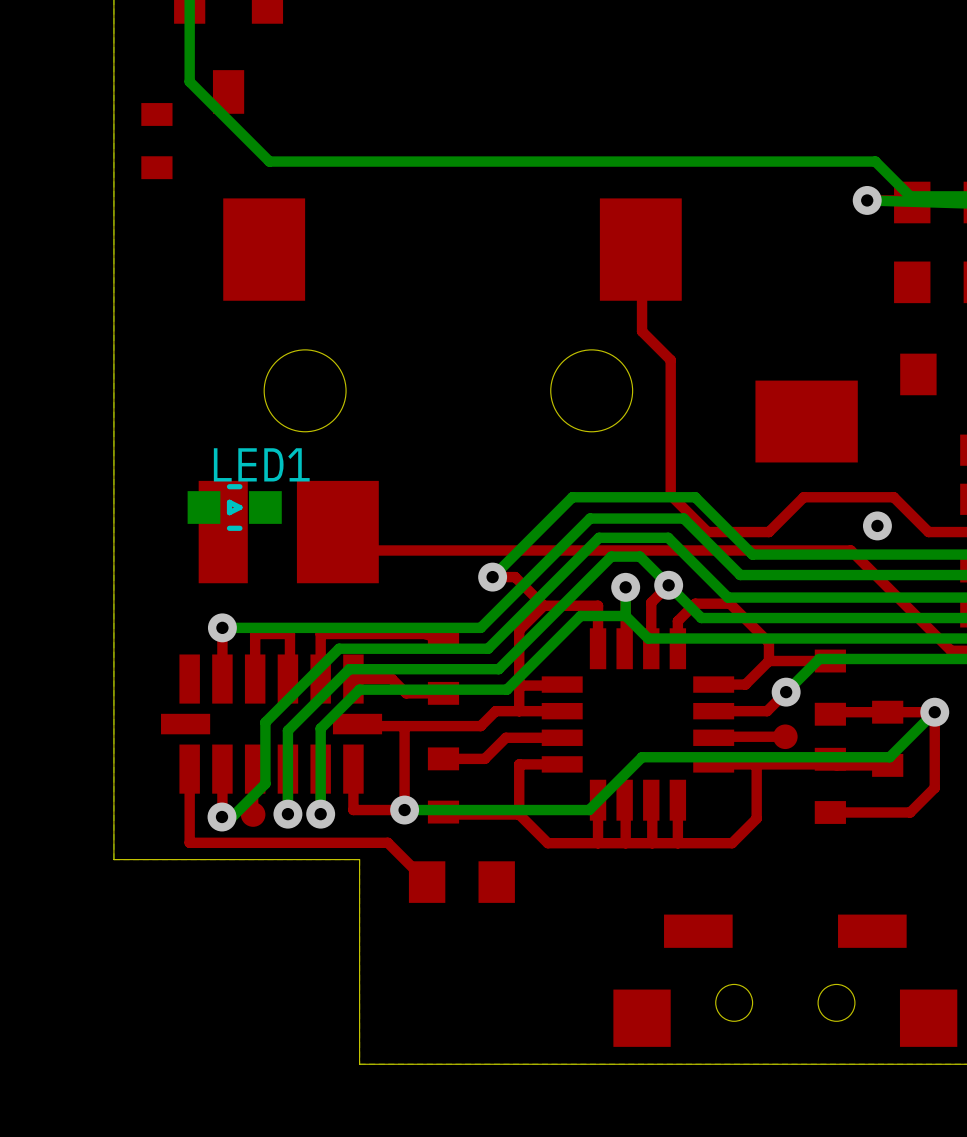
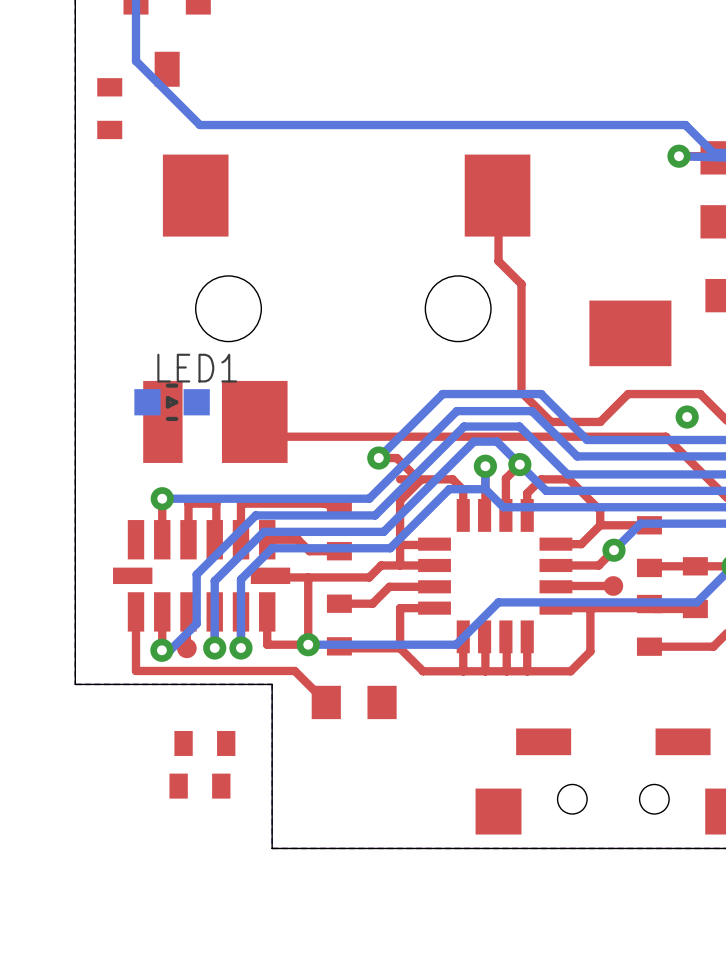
top track: (543, 605) (598, 605) (598, 617) -> (400, 479) (452, 479) (463, 490)
part: none -> (204, 743)
part: none -> (199, 786)

